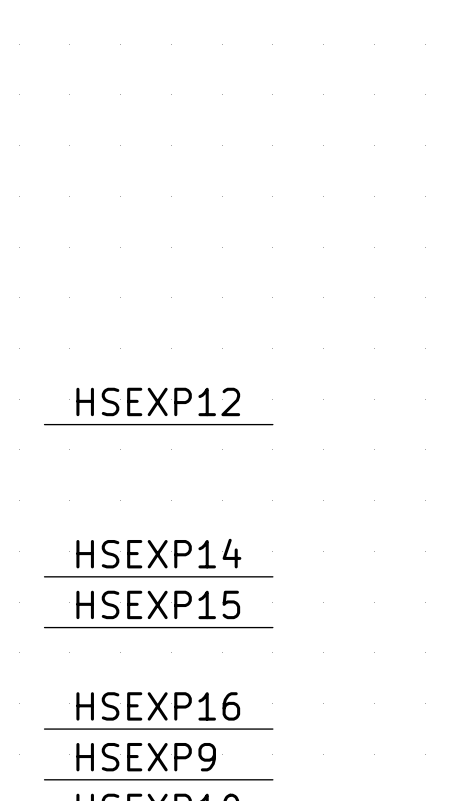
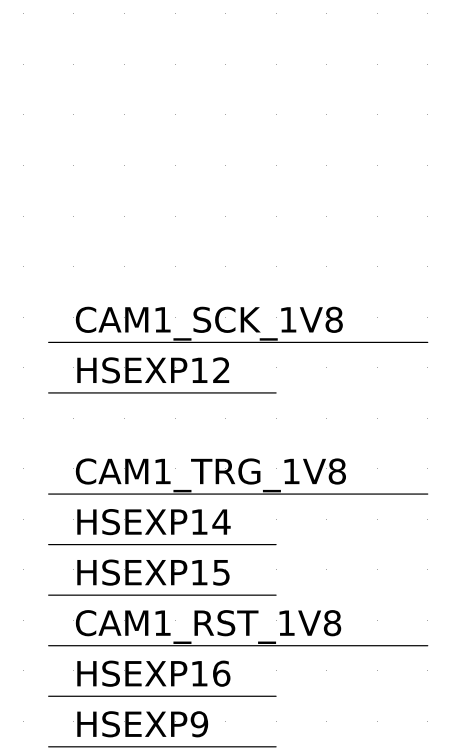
label: none -> CAM1_SCK_1V8 (209, 323)
wire: none -> (48, 342) (427, 342)
label: none -> CAM1_TRG_1V8 (210, 475)
wire: none -> (48, 494) (427, 494)
label: none -> CAM1_RST_1V8 (208, 627)
wire: none -> (48, 645) (427, 645)

